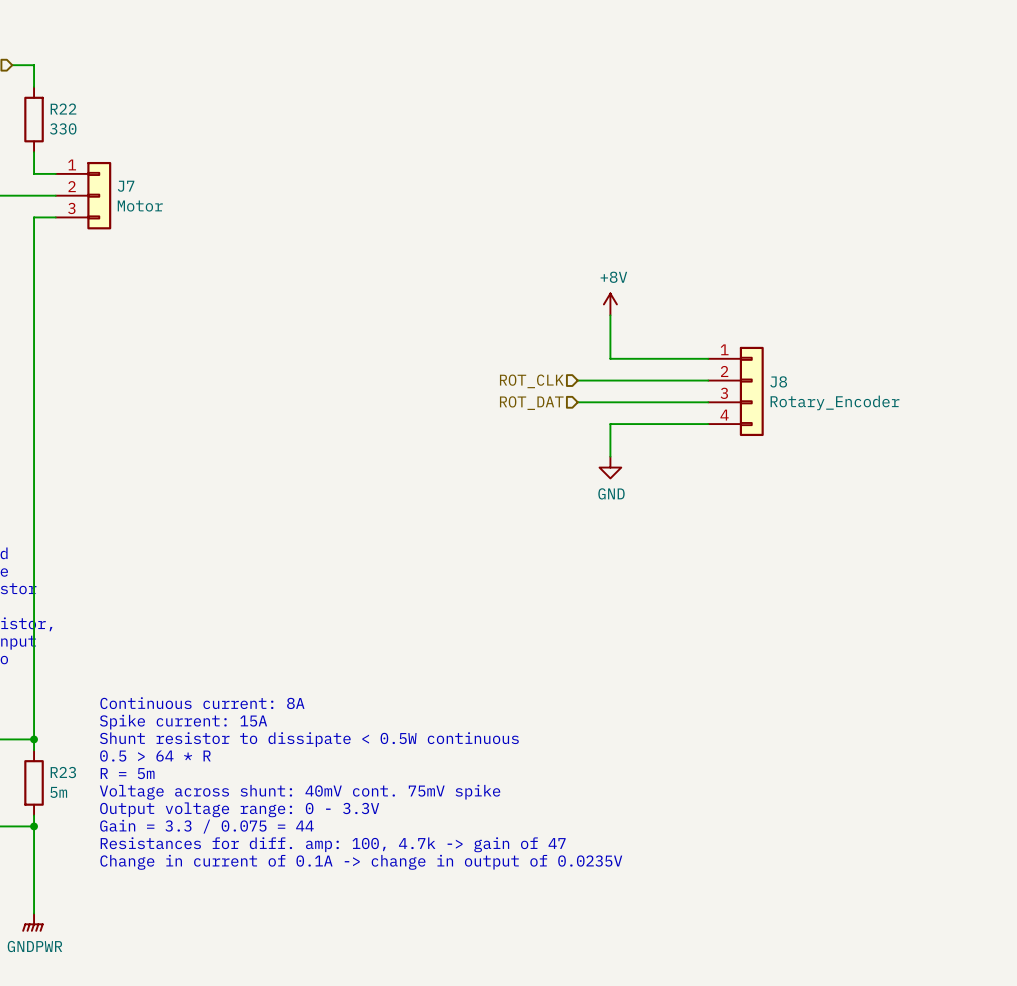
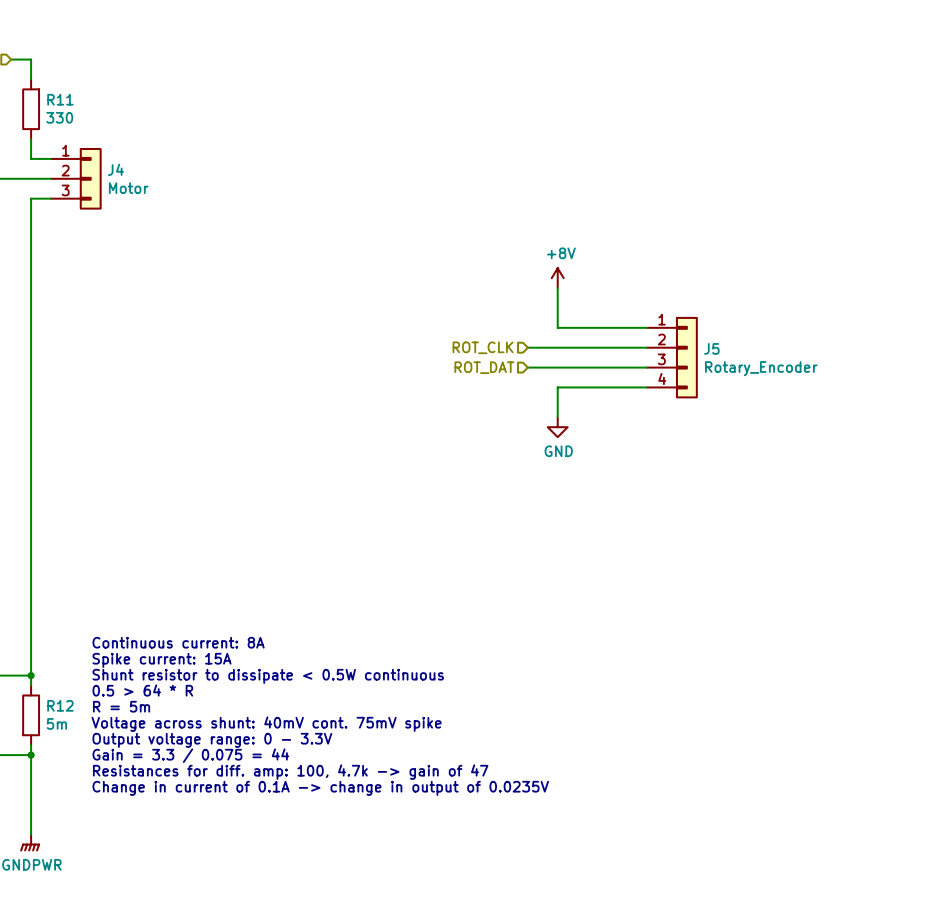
R22 name: R22 (63, 109) -> R11 (60, 99)
J7 name: J7 (126, 186) -> J4 (115, 169)
J8 name: J8 (778, 381) -> J5 (711, 348)
R23 name: R23 (63, 772) -> R12 (60, 705)

